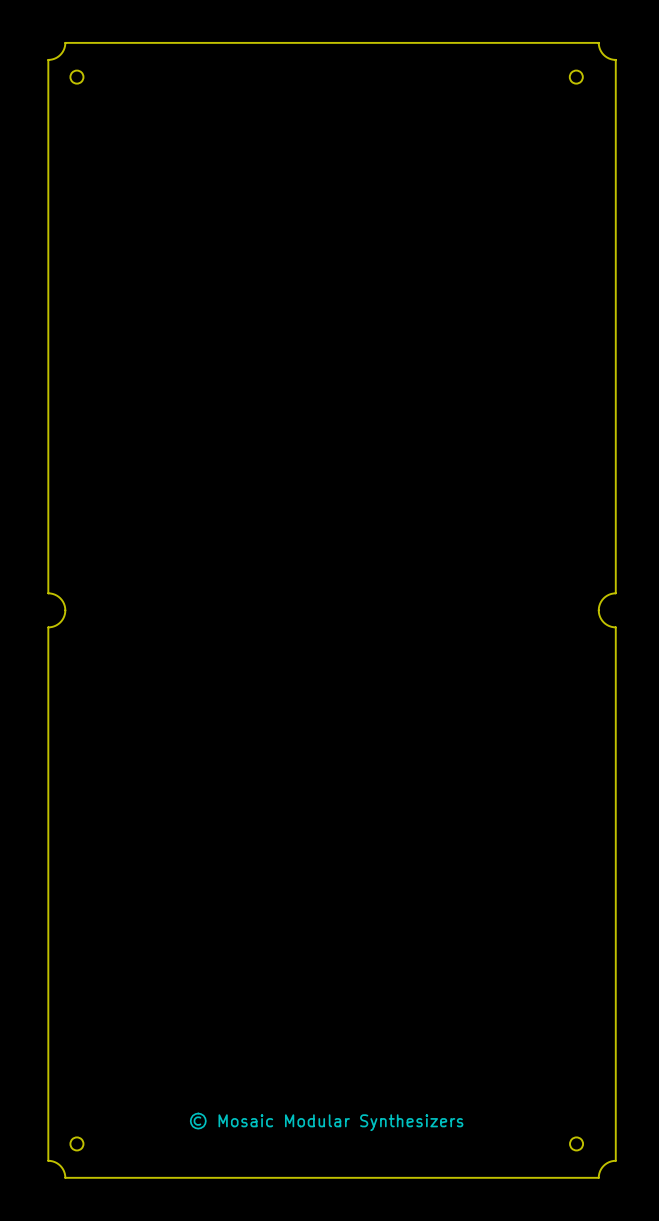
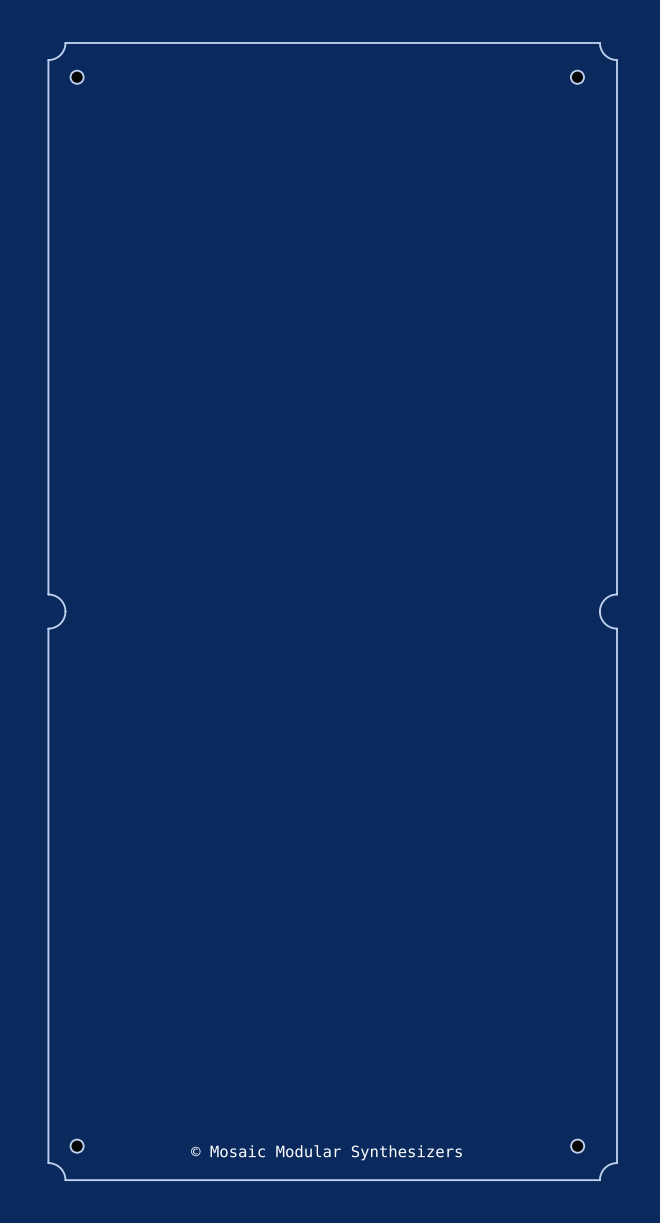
drawing position: (326, 1121) -> (326, 1152)

